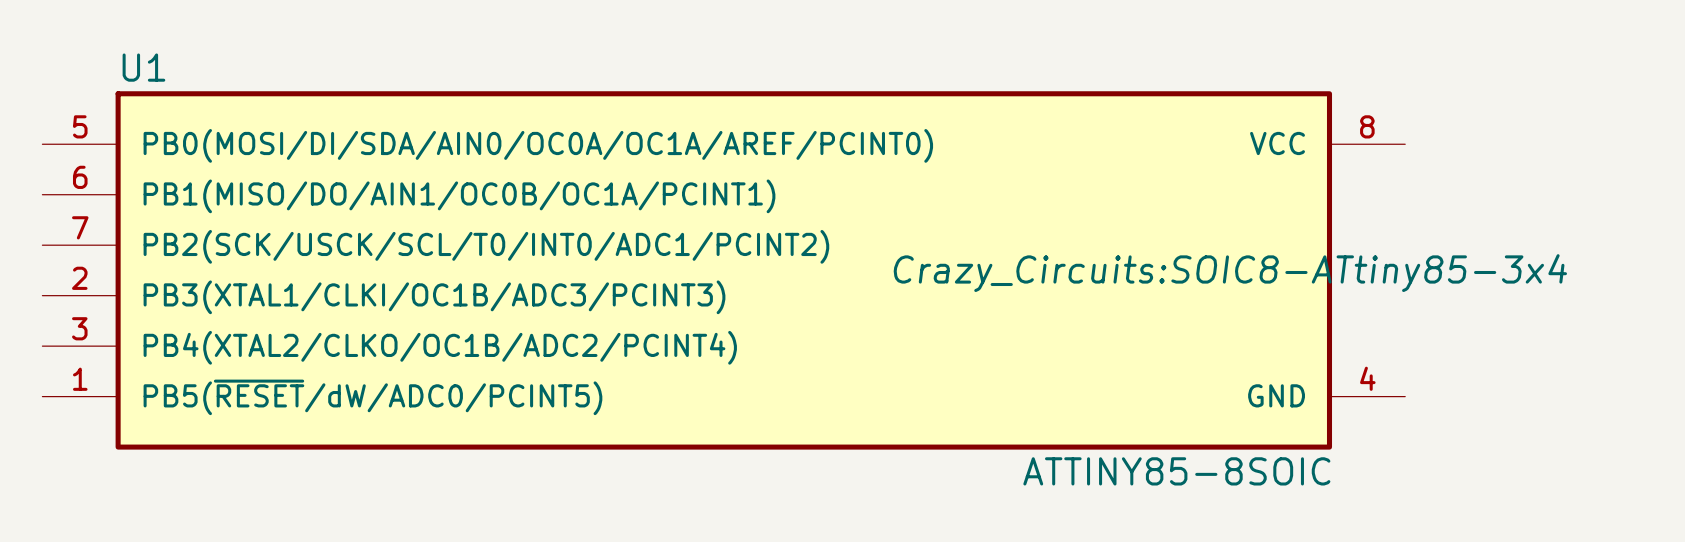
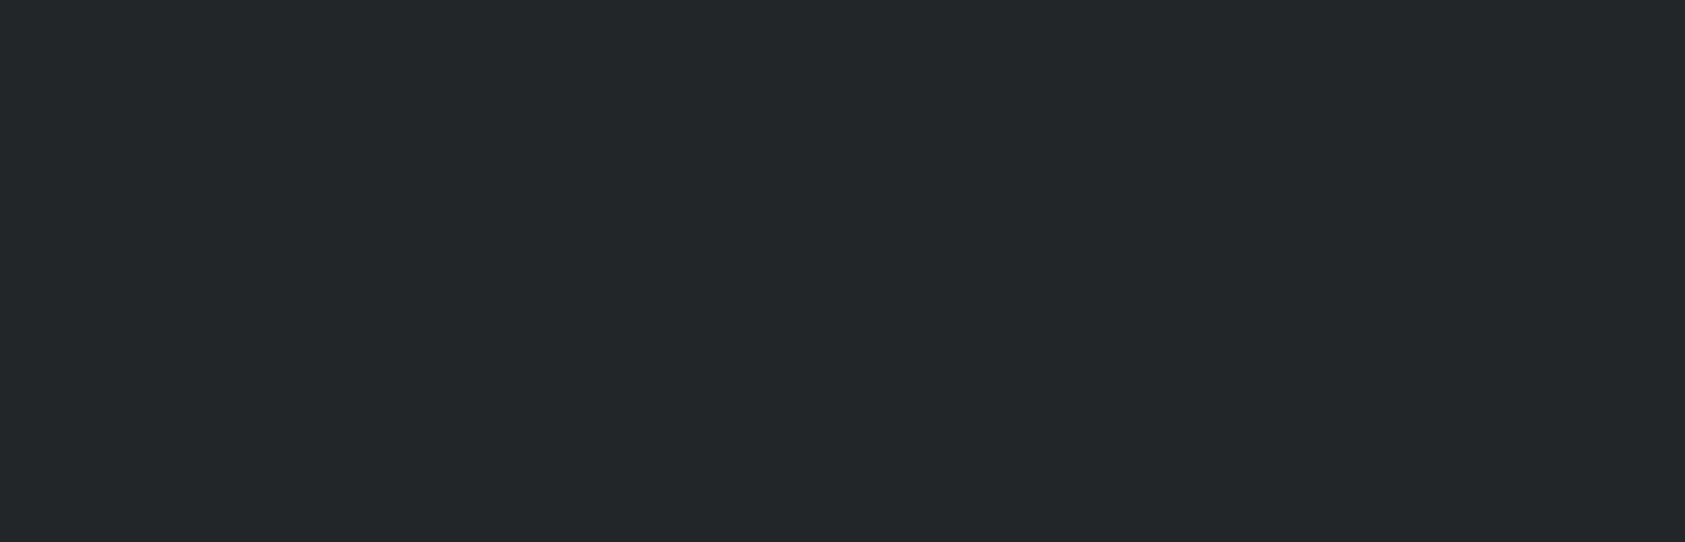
U1: ATTINY85-8SOIC (723, 270) -> none

